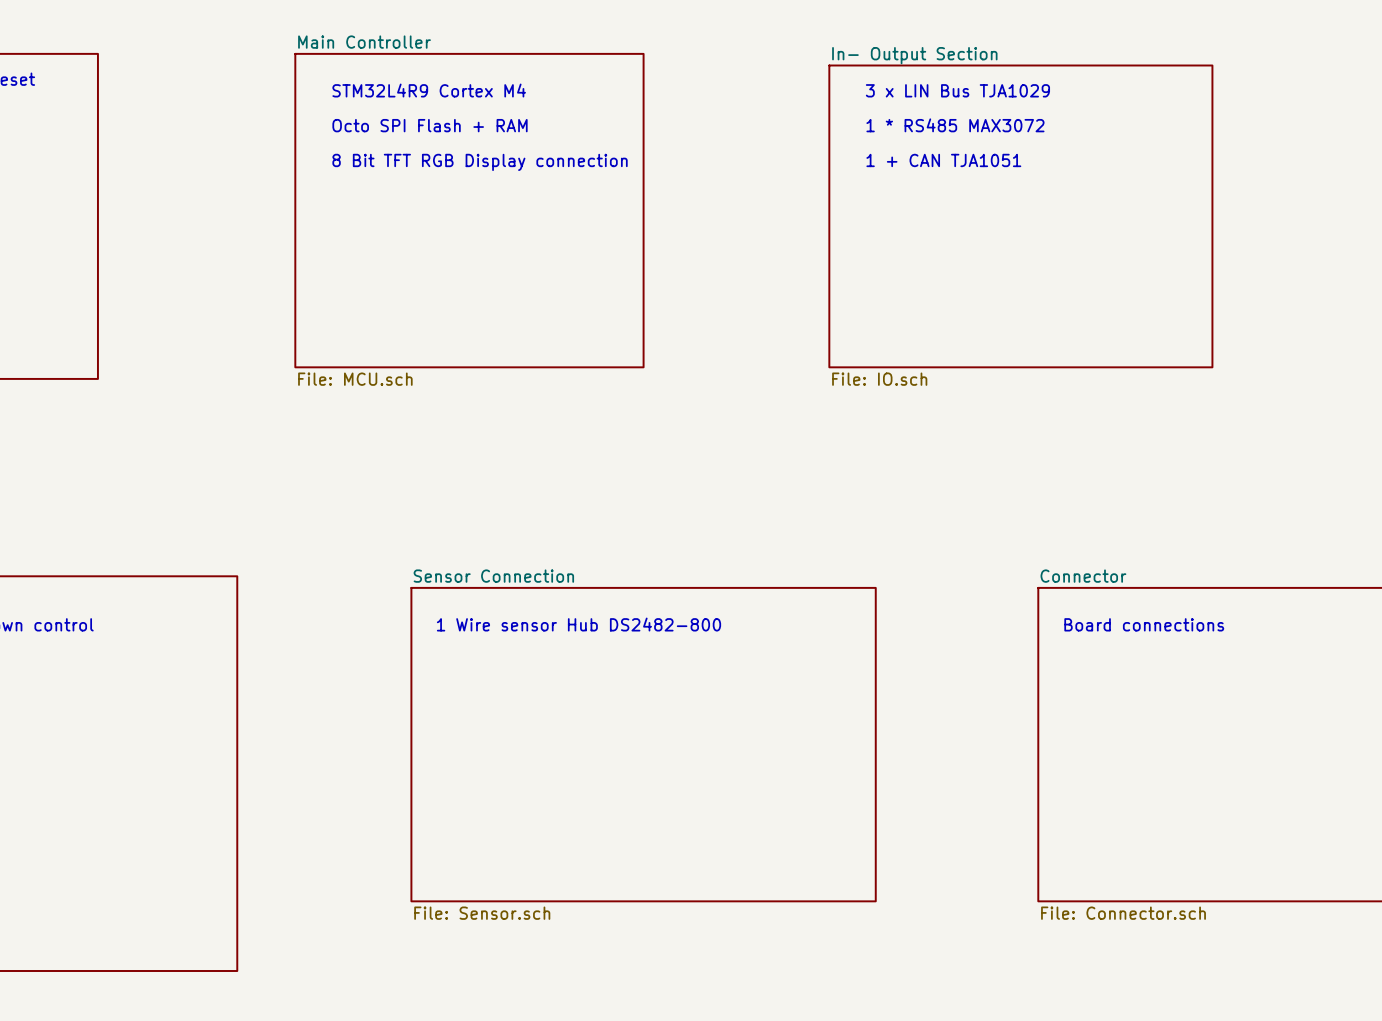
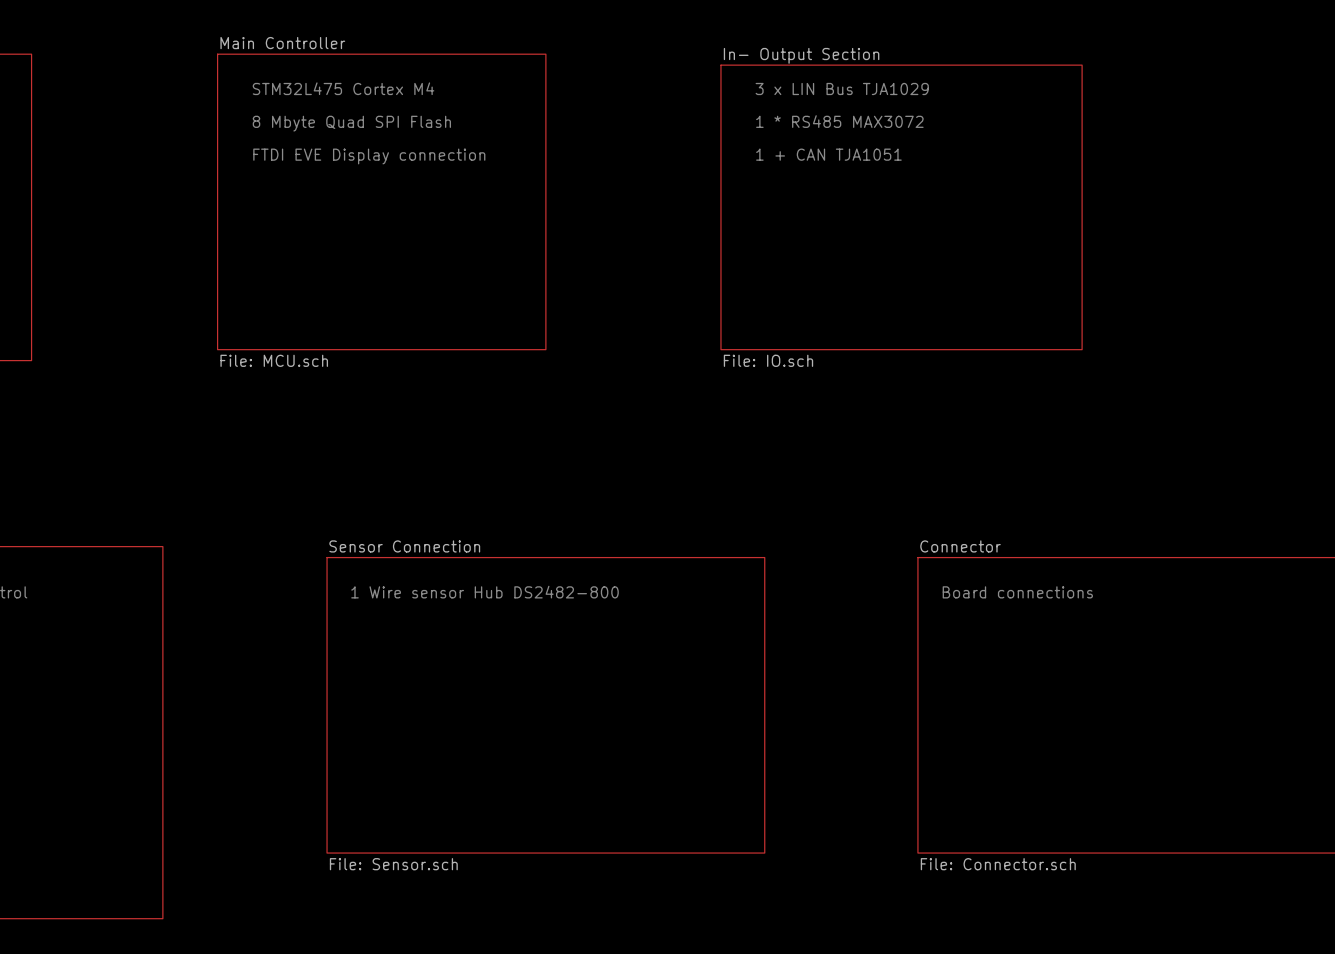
text: STM32L4R9 Cortex M4 (429, 90) -> STM32L475 Cortex M4 (343, 88)
text: Octo SPI Flash + RAM (430, 125) -> 8 Mbyte Quad SPI Flash (351, 123)
text: 8 Bit TFT RGB Display connection (480, 162) -> FTDI EVE Display connection (369, 156)

